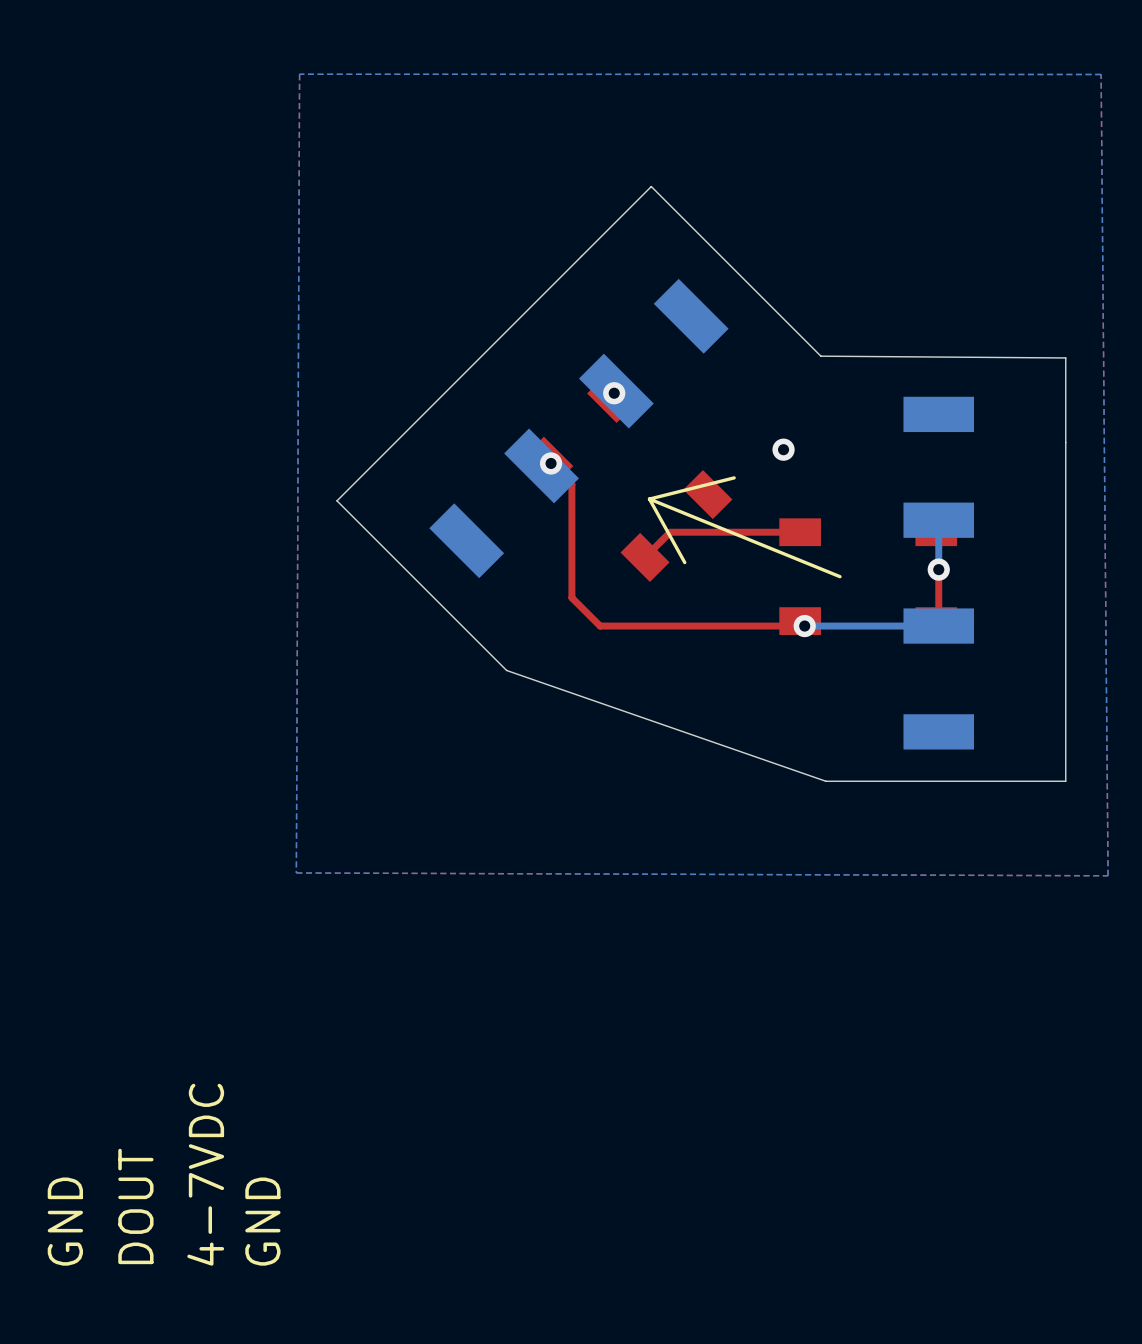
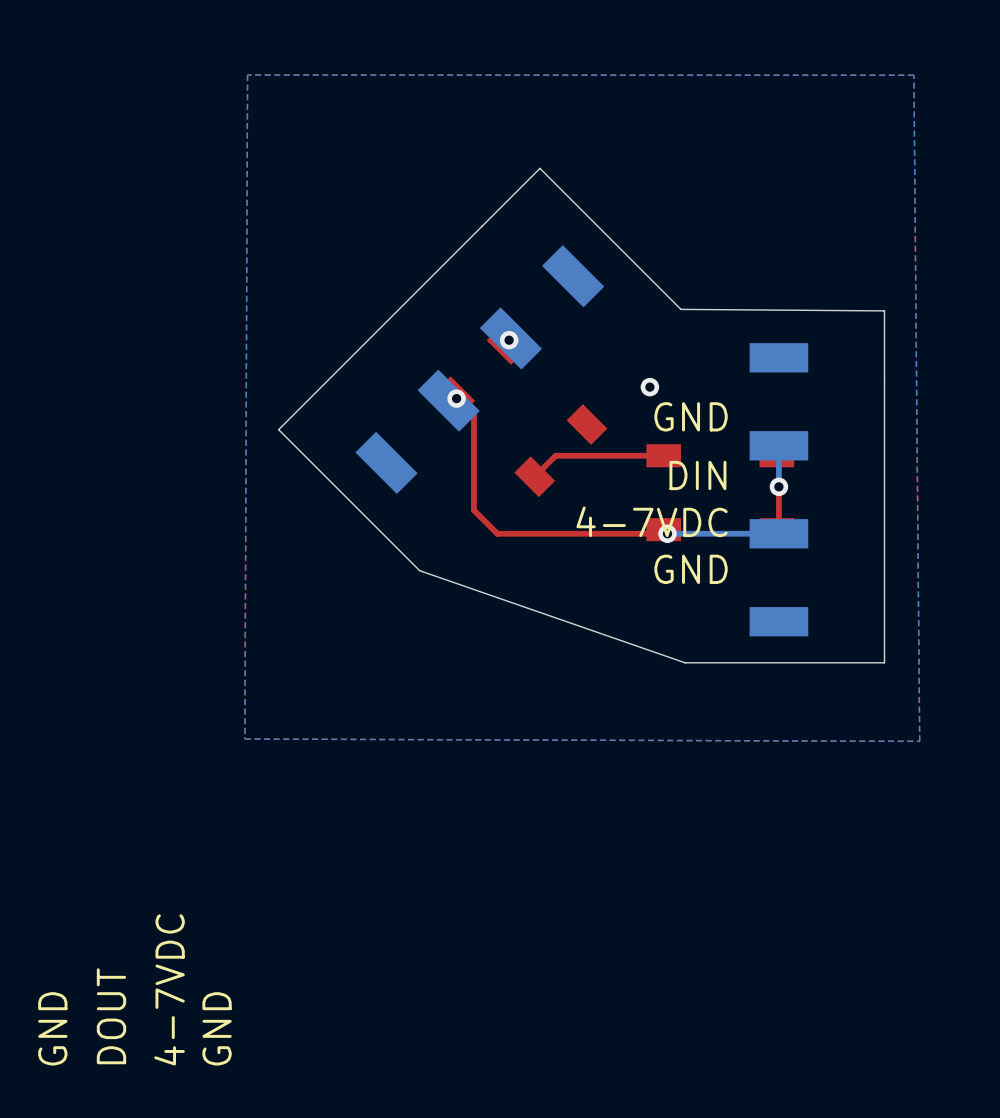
line: (734, 477) (649, 499) -> none
text: none -> GND (691, 416)
line: (649, 499) (839, 576) -> none
line: (649, 499) (684, 562) -> none
text: none -> DIN (697, 475)
text: none -> 4-7VDC (652, 521)
text: none -> GND (691, 569)

